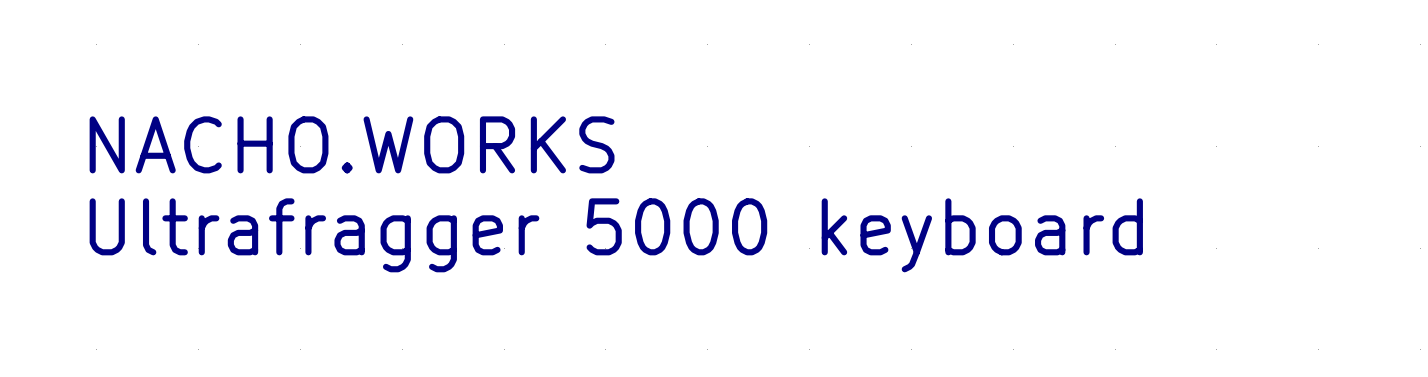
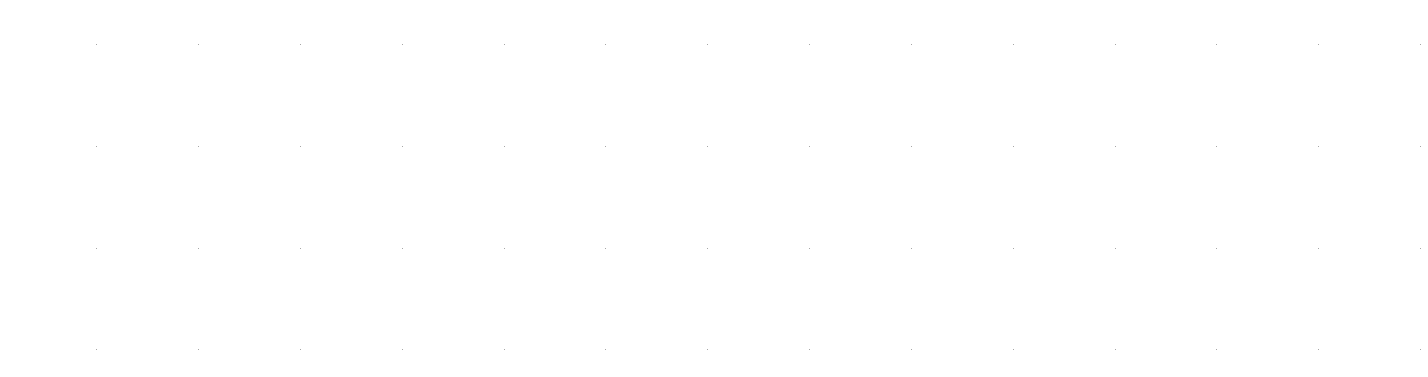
text: NACHO.WORKS (352, 144) -> none
text: Ultrafragger 5000 keyboard (616, 235) -> none

